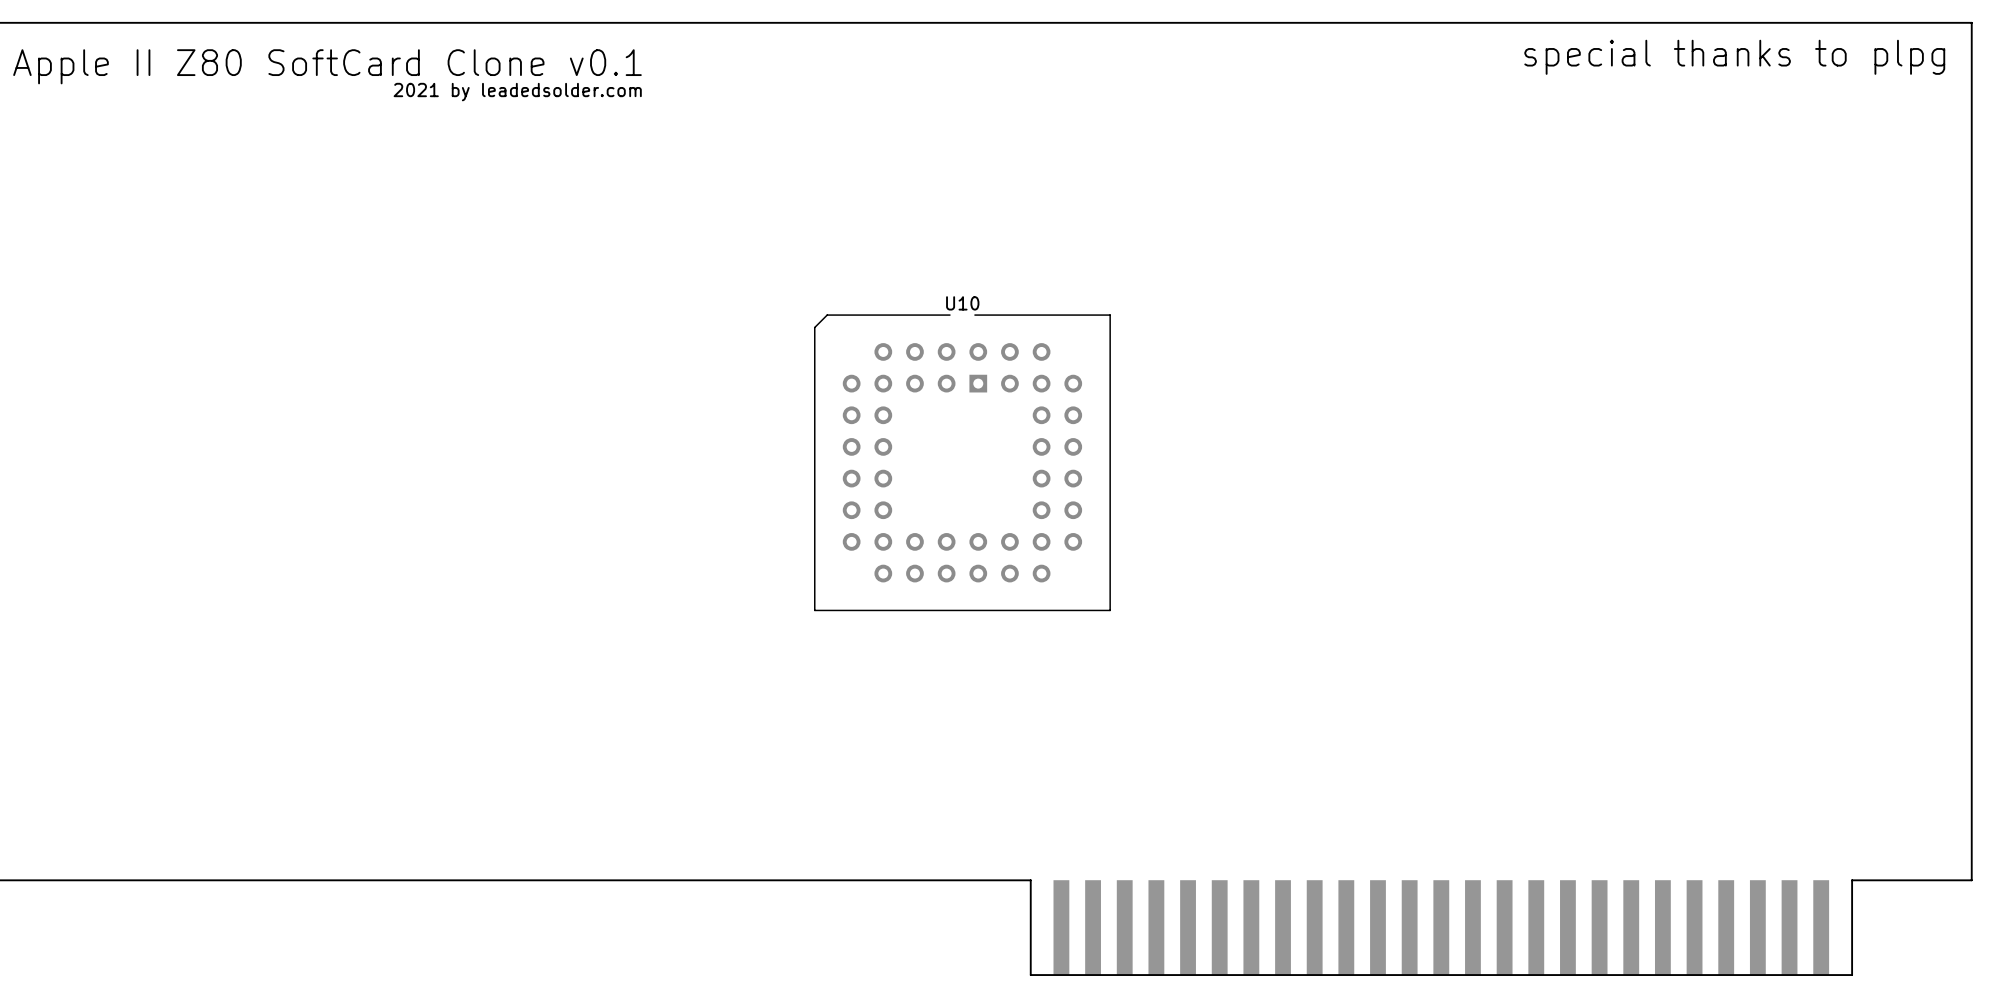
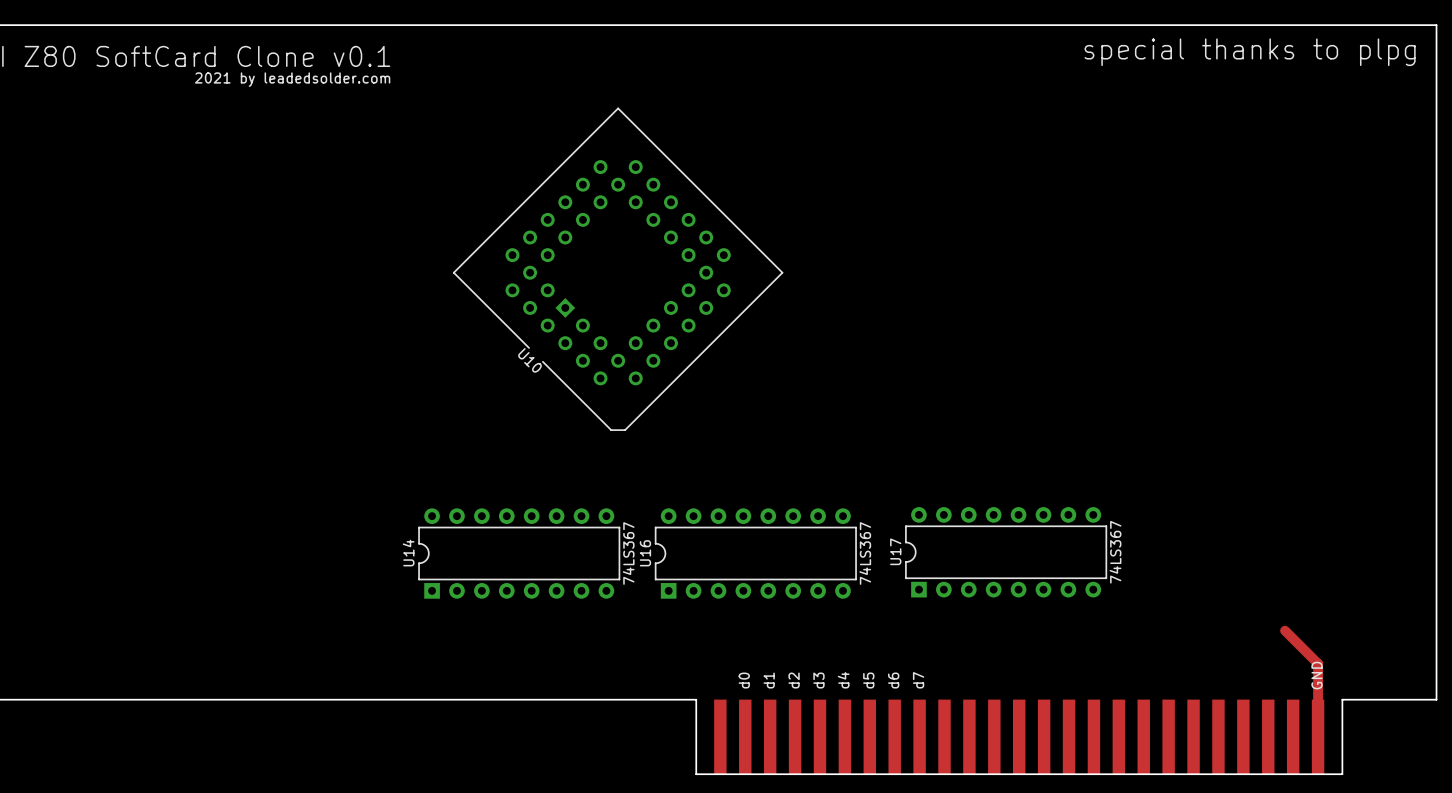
U10 rotation: 0° (962, 462) -> 135° counterclockwise (618, 269)
U17: none -> 74LS367 (1006, 552)
U14: none -> 74LS367 (519, 553)
U16: none -> 74LS367 (755, 553)
track: none -> (1285, 630) (1318, 663) (1318, 736)
text: none -> GND (1317, 675)
text: none -> d0 (744, 680)
text: none -> d1 (769, 680)
text: none -> d2 (794, 680)
text: none -> d3 (818, 680)
text: none -> d4 (843, 680)
text: none -> d5 (868, 680)
text: none -> d6 (893, 680)
text: none -> d7 (918, 680)

